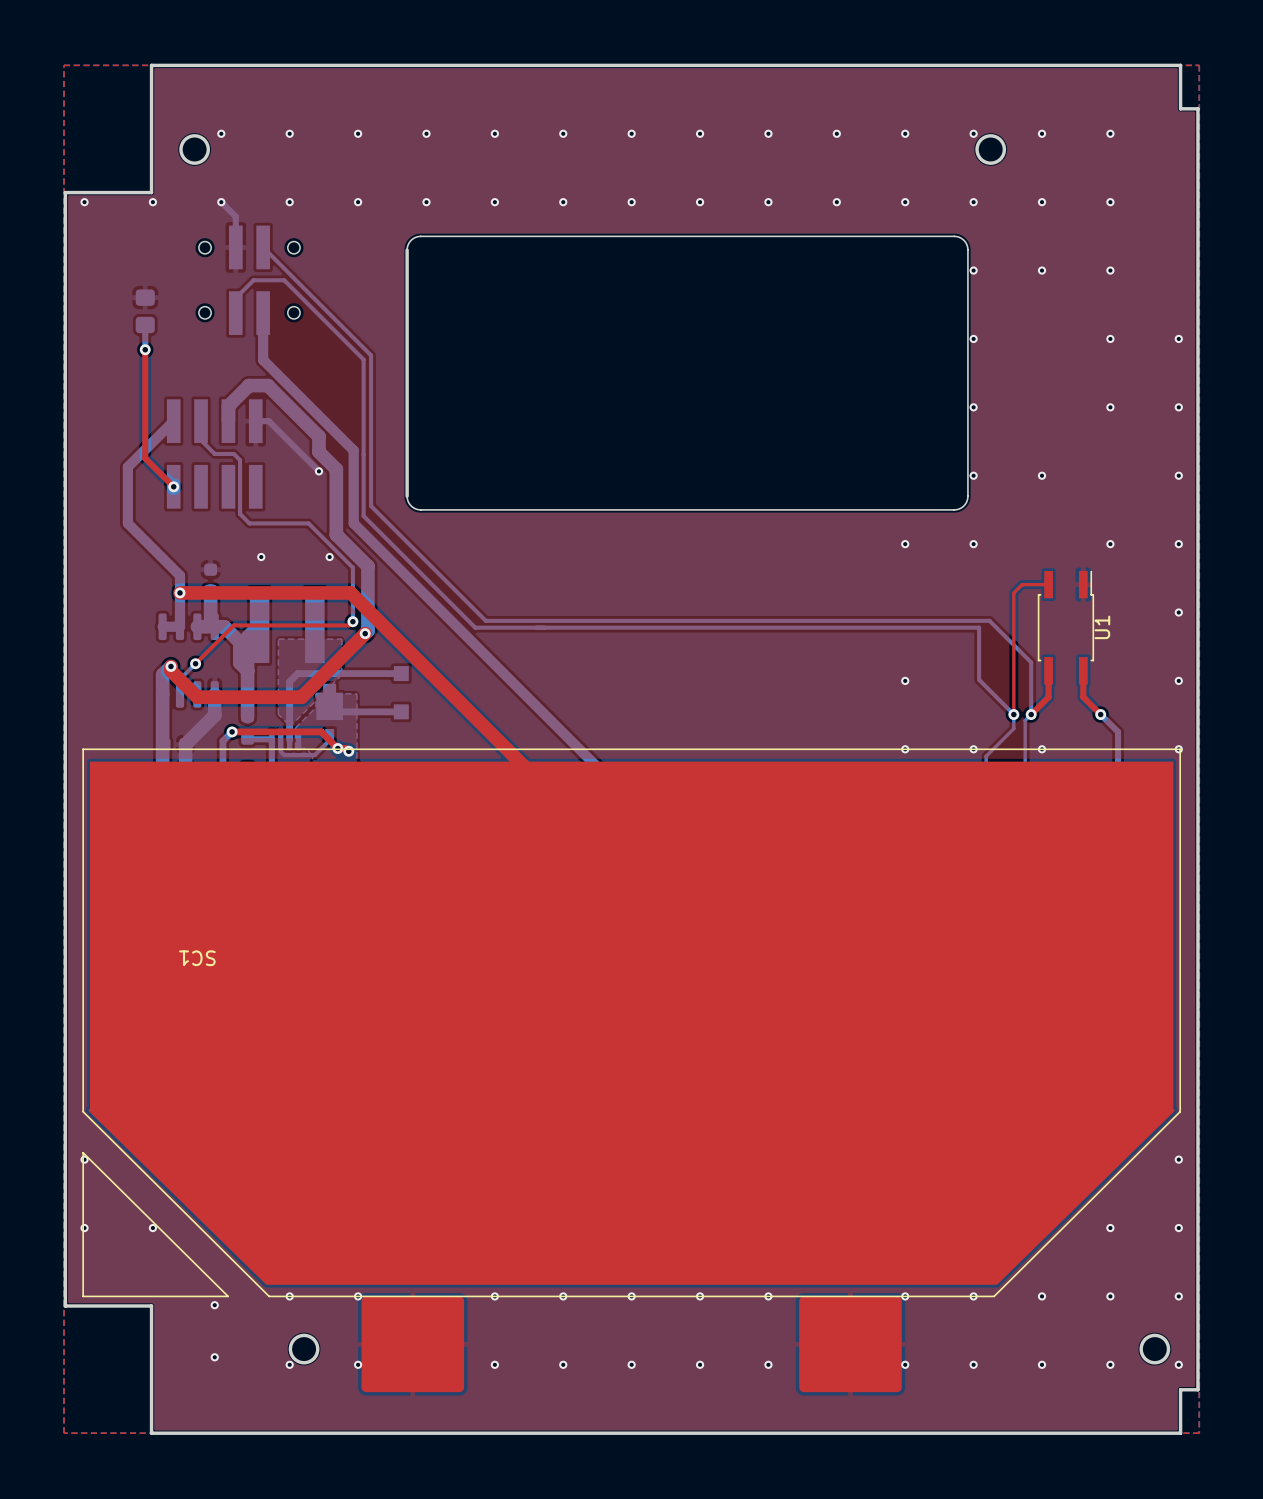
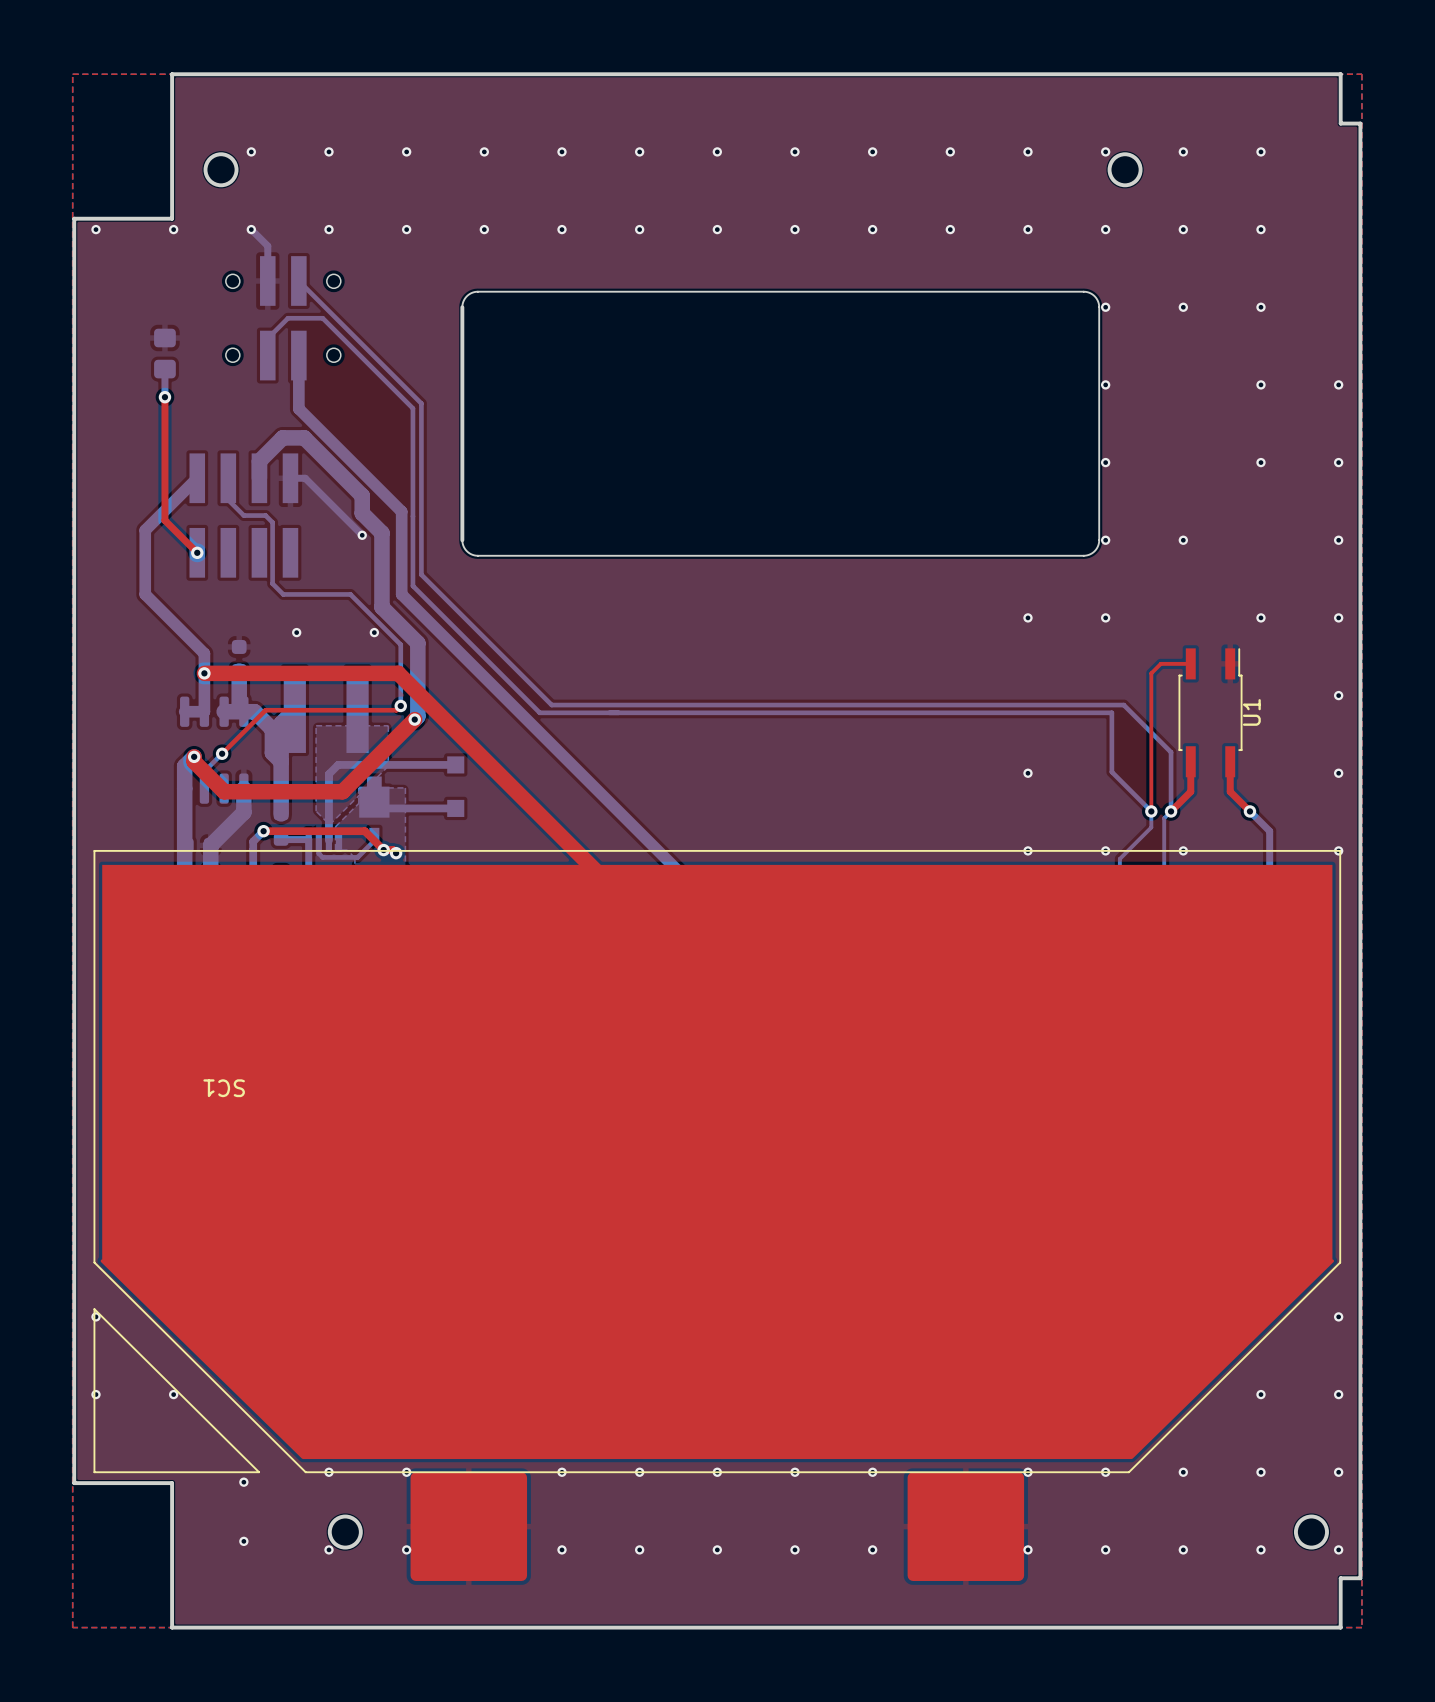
drawing shape: [63, 63, 1200, 1435] -> [72, 72, 1363, 1630]

